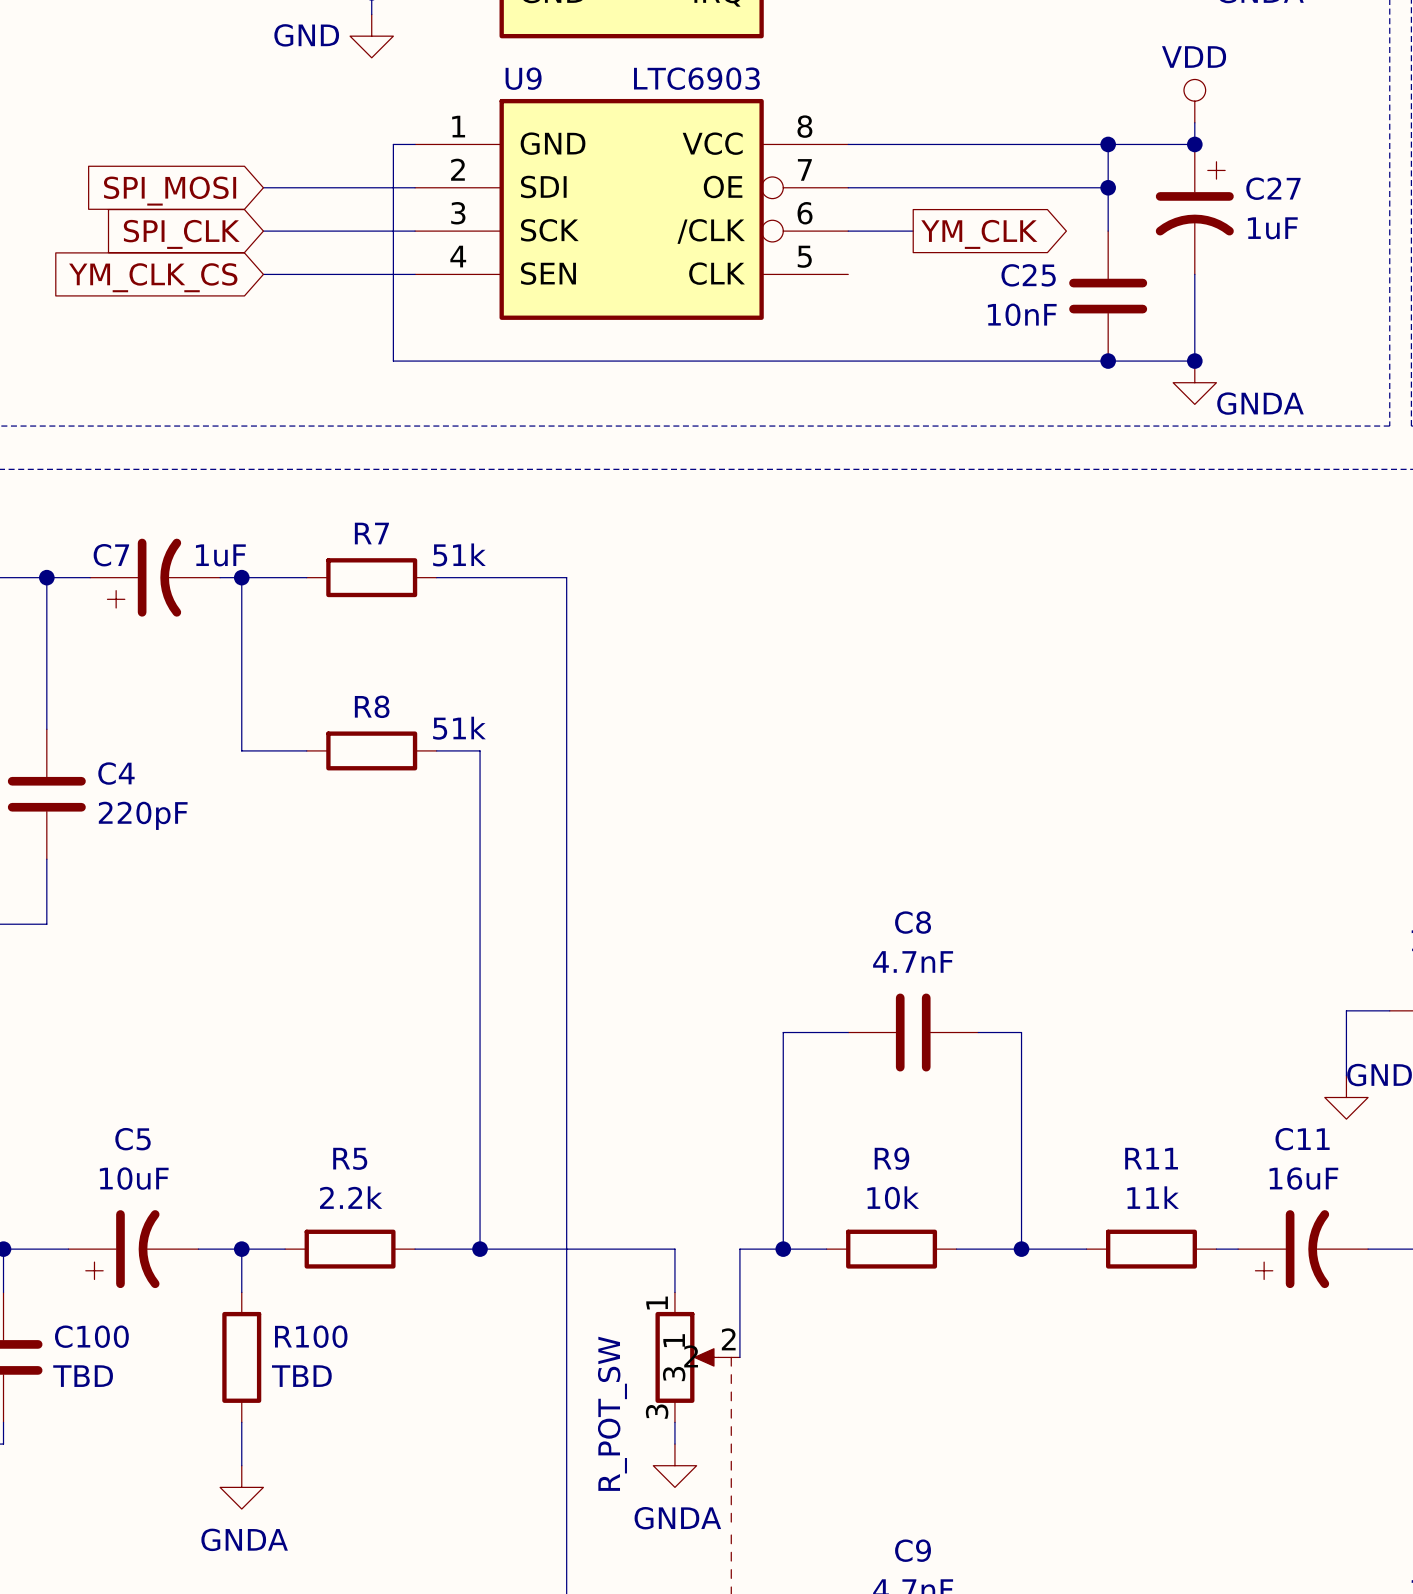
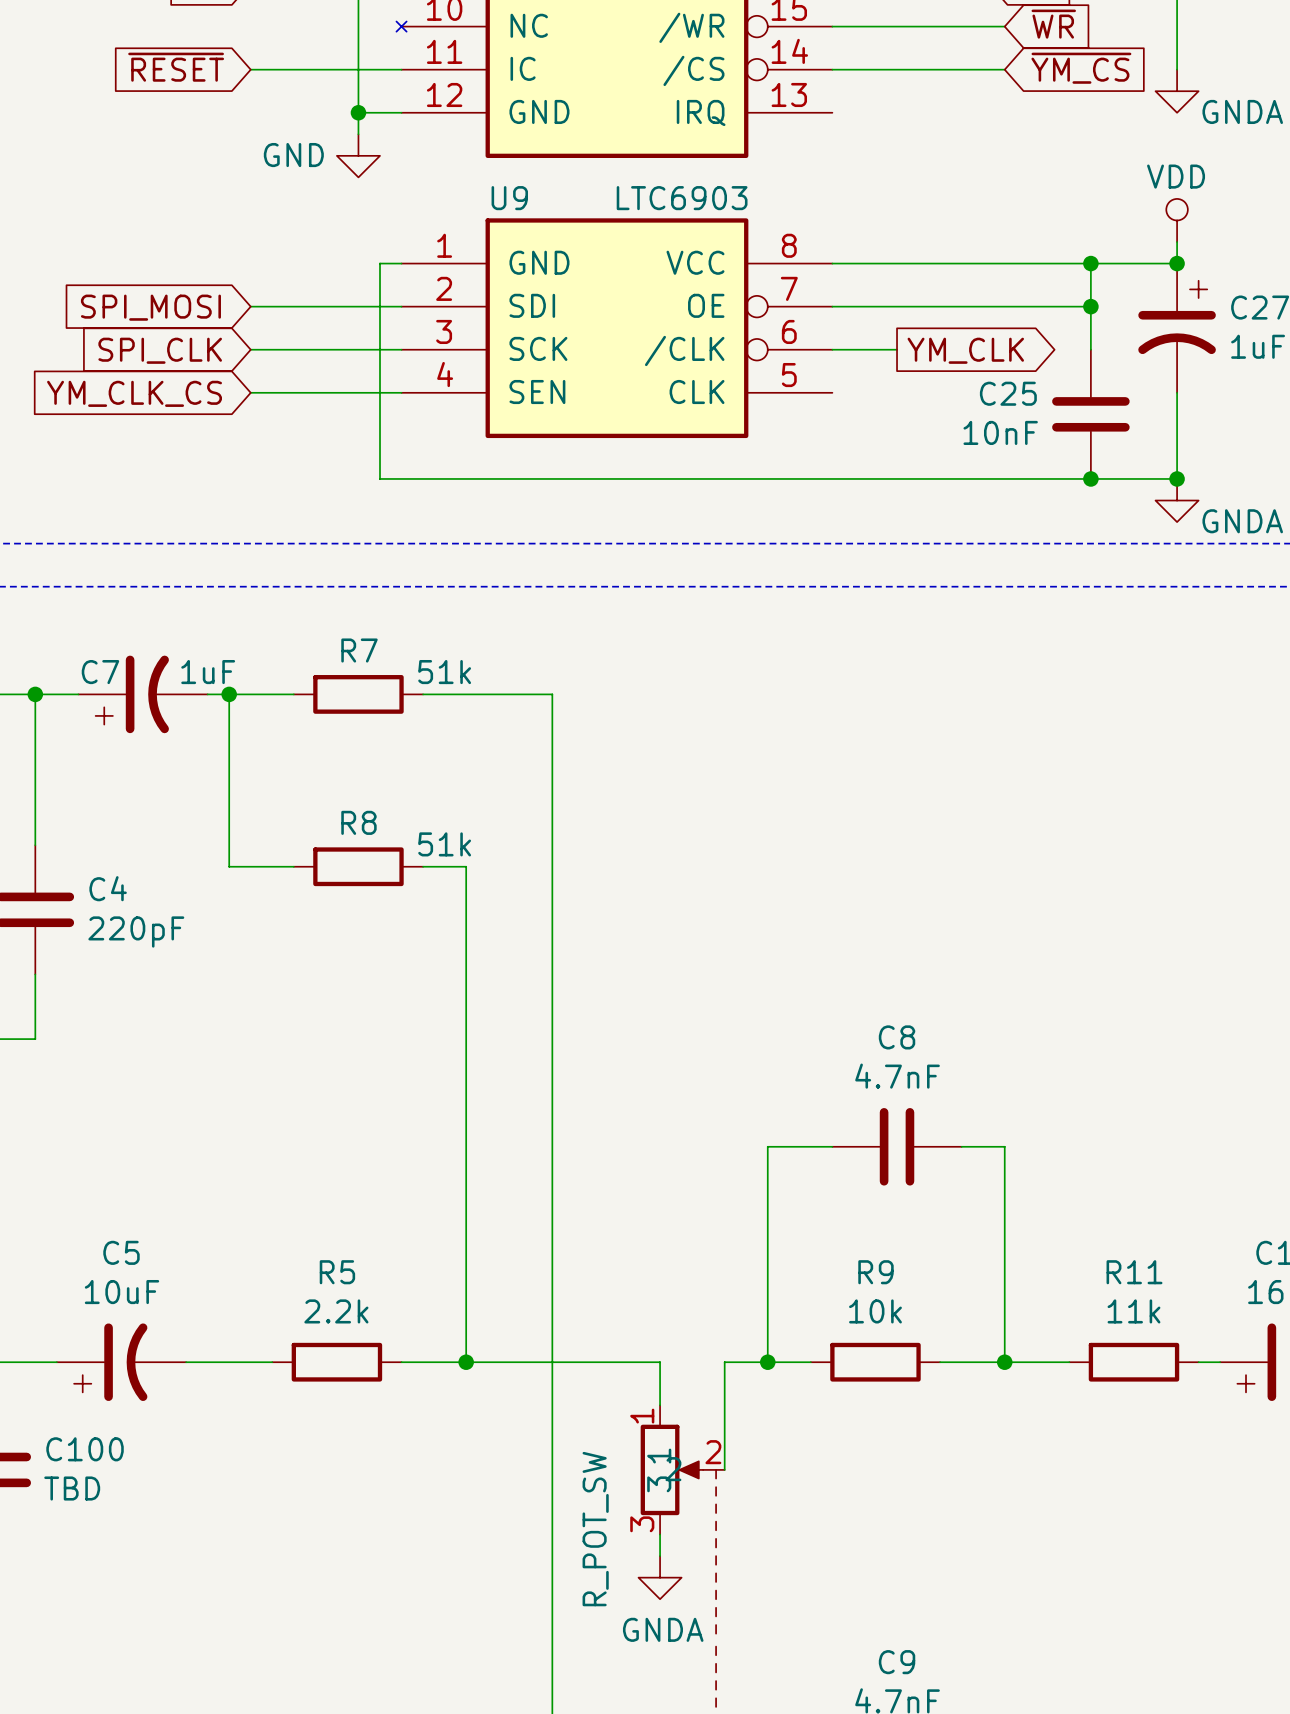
wire: (241, 1249) (241, 1292) -> none
junction: (241, 1249) -> none
R100: TBD (241, 1357) -> none
wire: (241, 1422) (241, 1465) -> none
power symbol: GNDA (241, 1487) -> none

